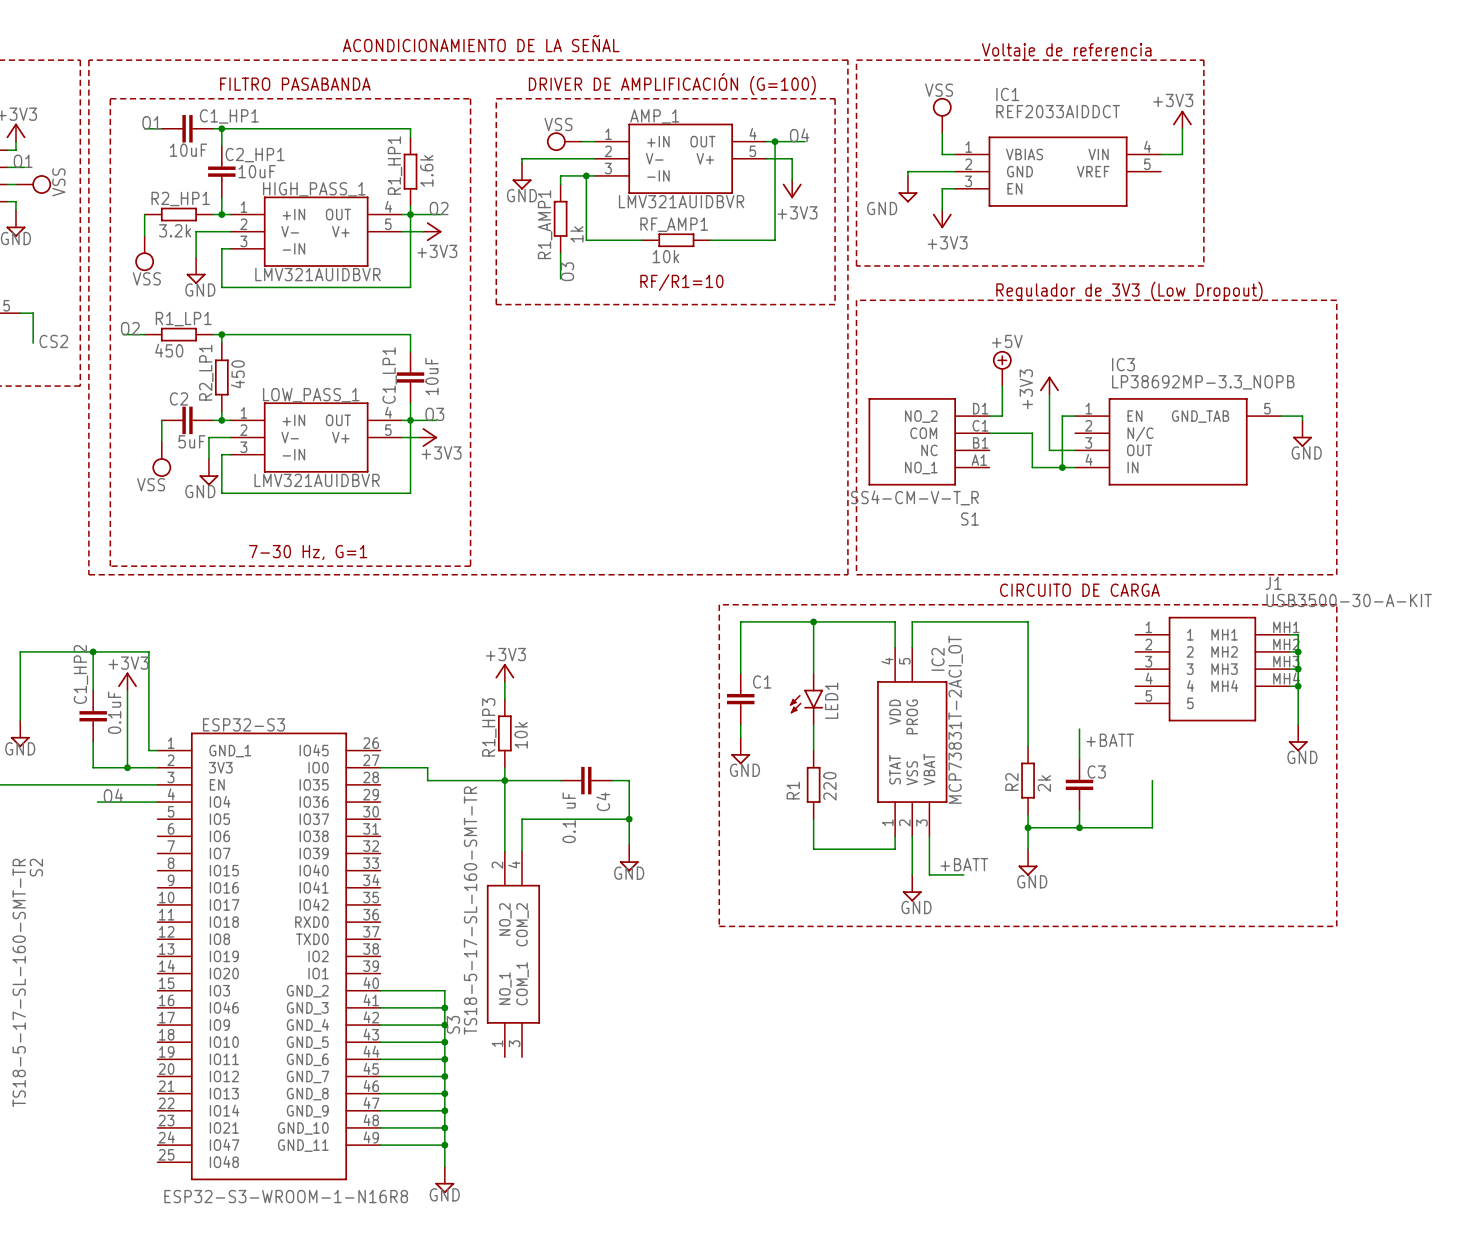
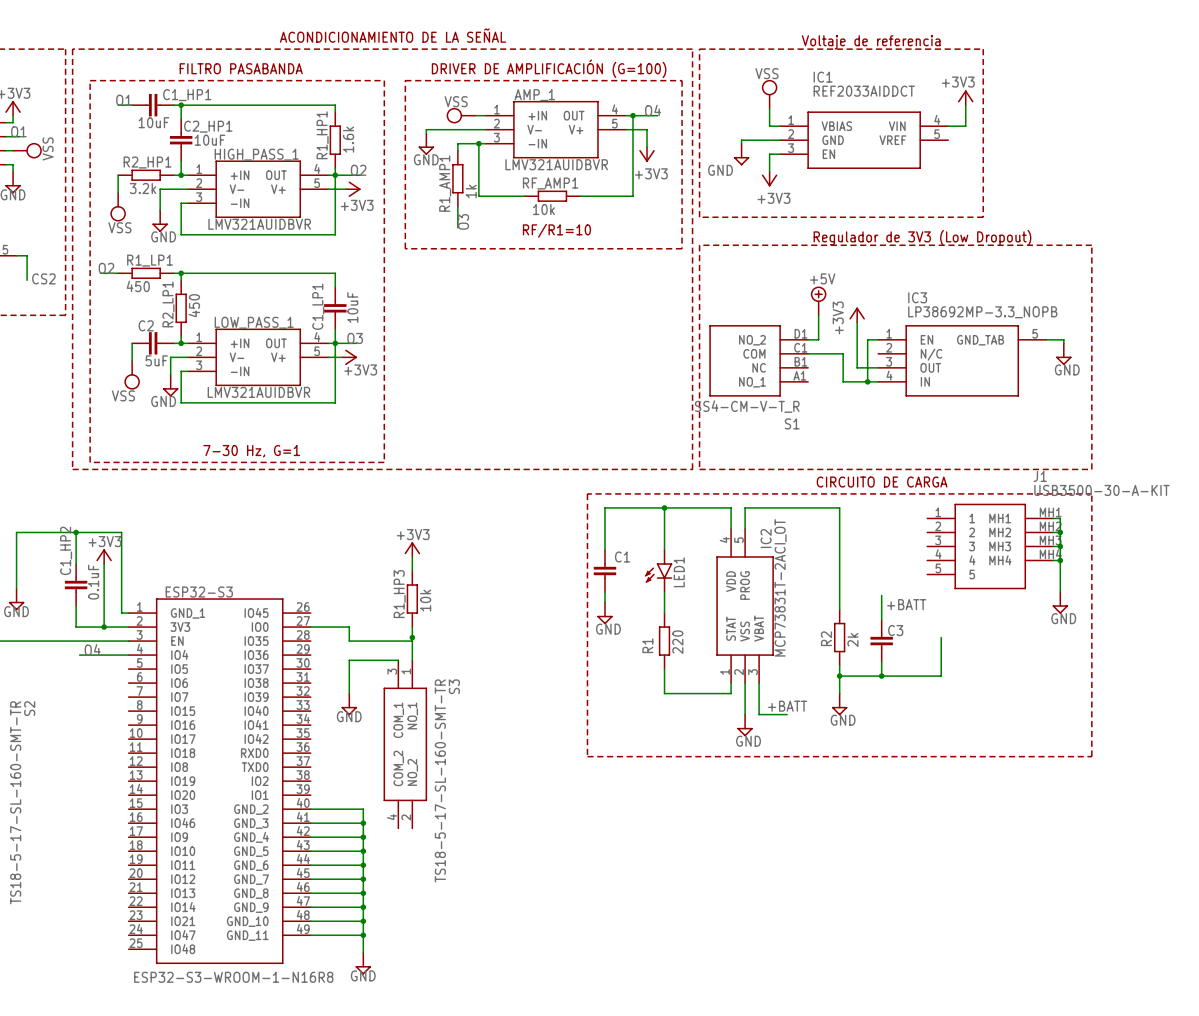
wire: (427, 780) (560, 780) -> (349, 637) (349, 641) (412, 641)
C4: 0.1 uF (586, 780) -> none
wire: (612, 780) (629, 780) (629, 844) -> none
wire: none -> (398, 660) (349, 660) (349, 693)
wire: (629, 819) (522, 819) (522, 851) -> none
junction: (629, 819) -> none
power symbol: GND (629, 858) -> none
power symbol: none -> GND (349, 704)
S3 rotation: 0° (513, 954) -> 180° (405, 744)

